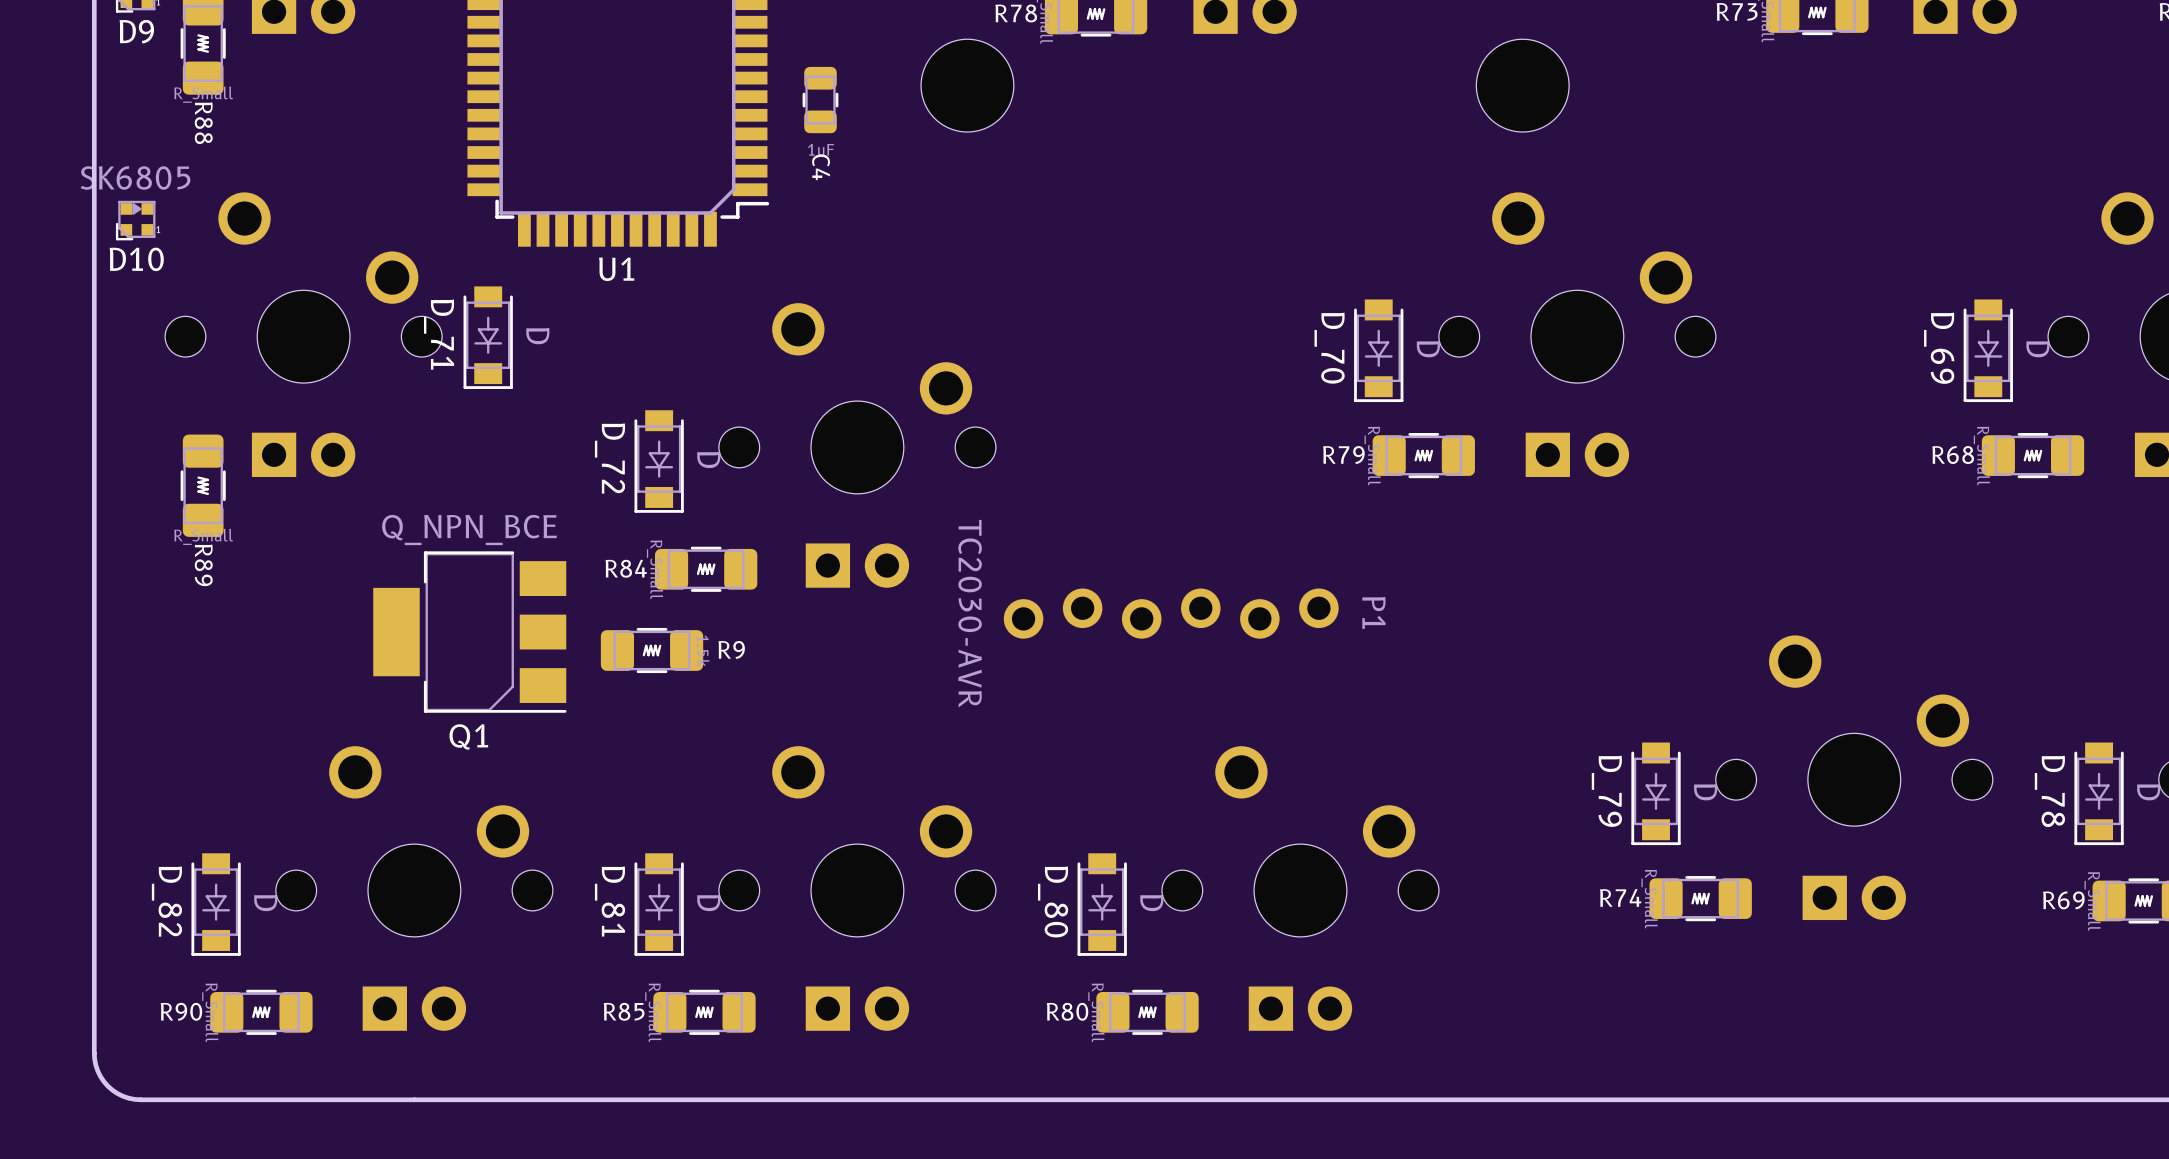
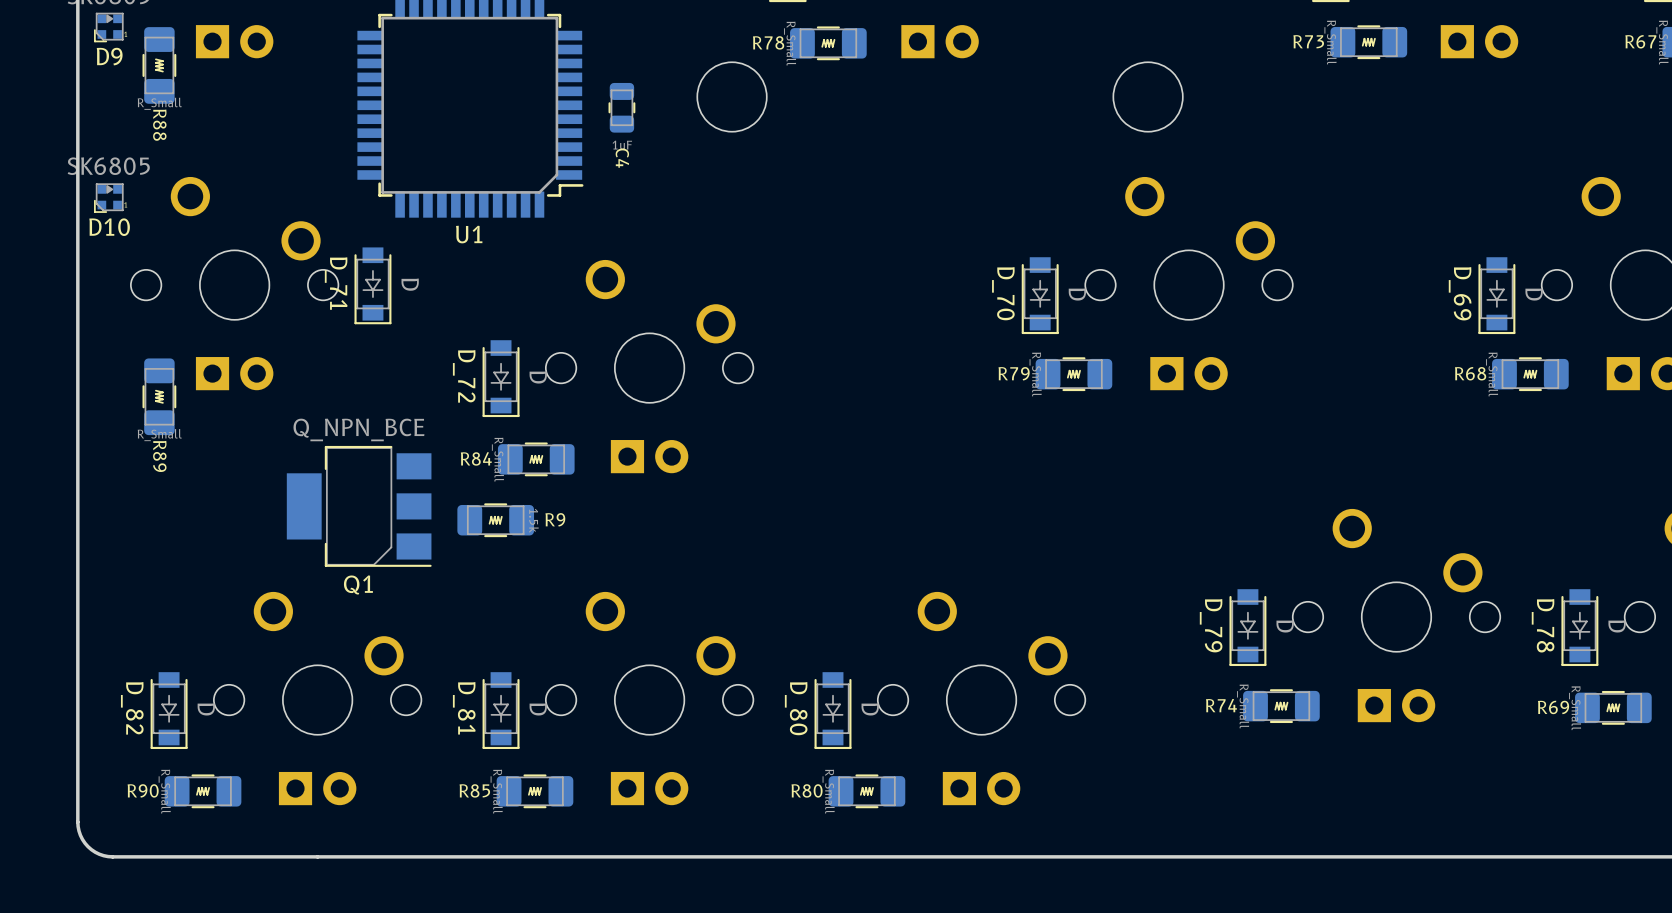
P1: TC2030-AVR (1171, 613) -> none

